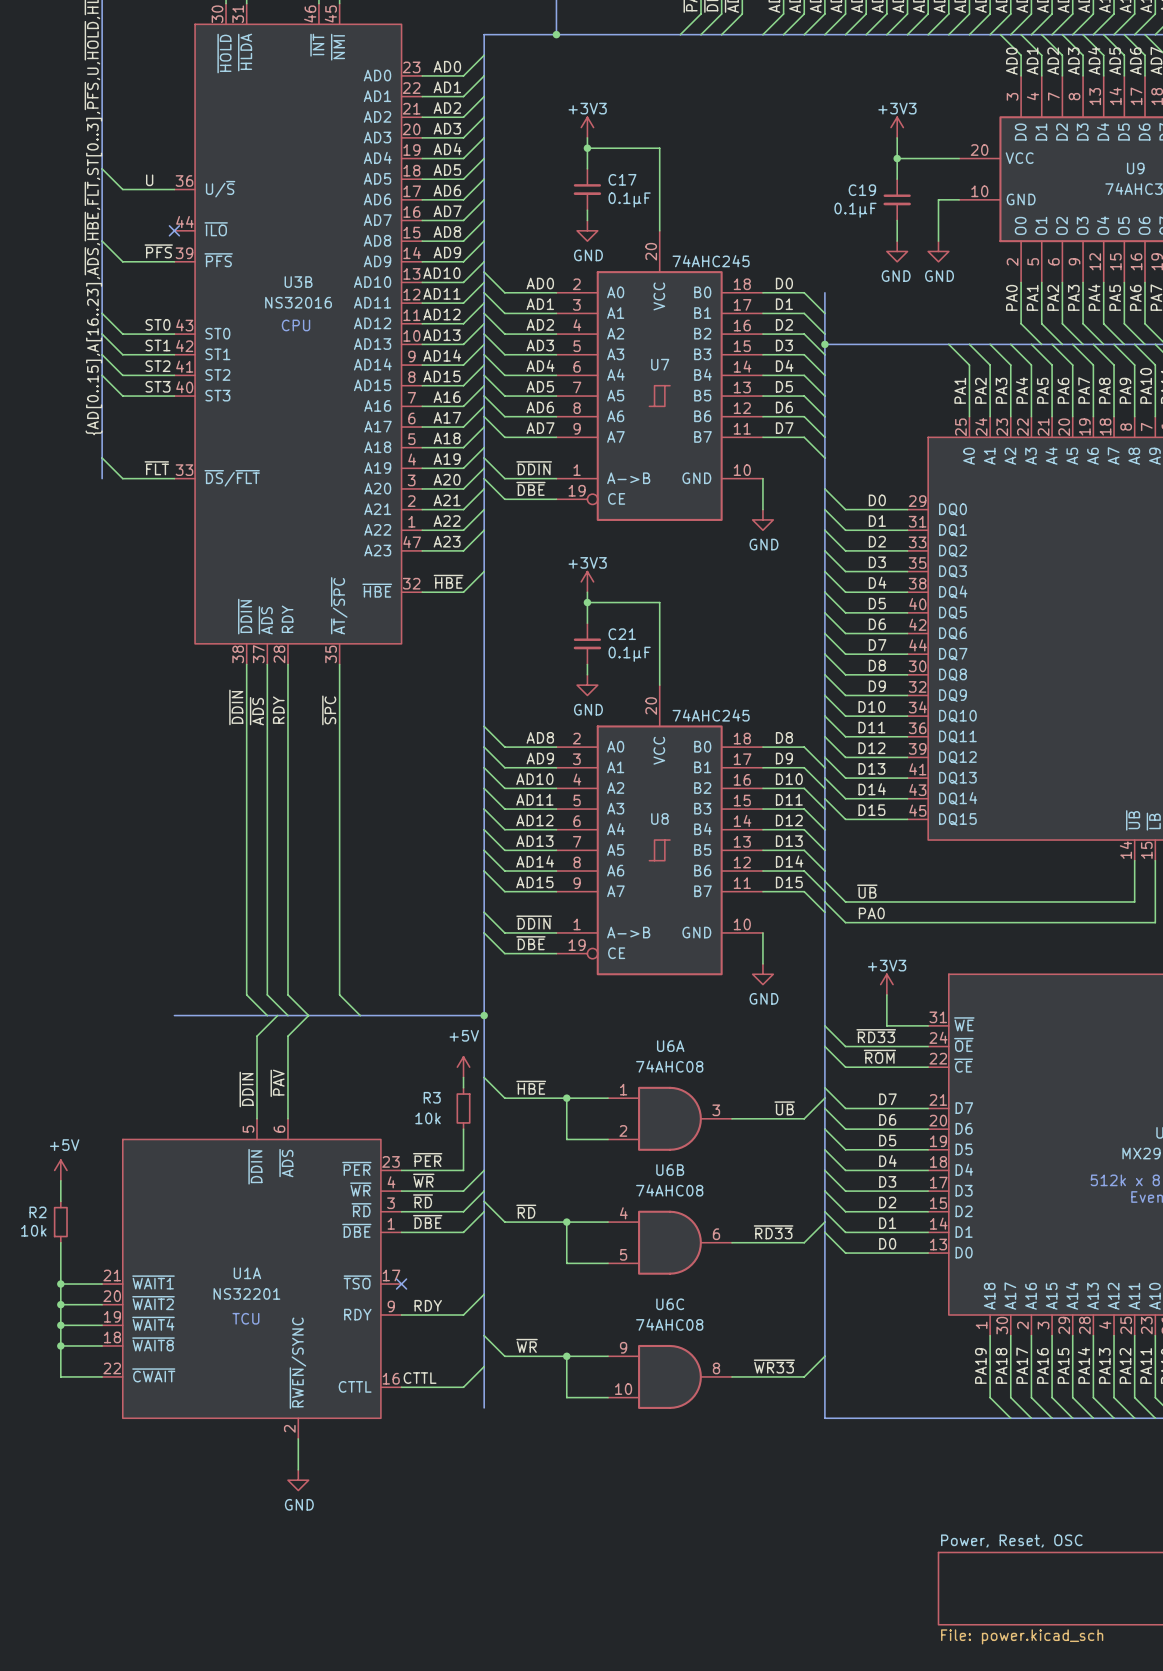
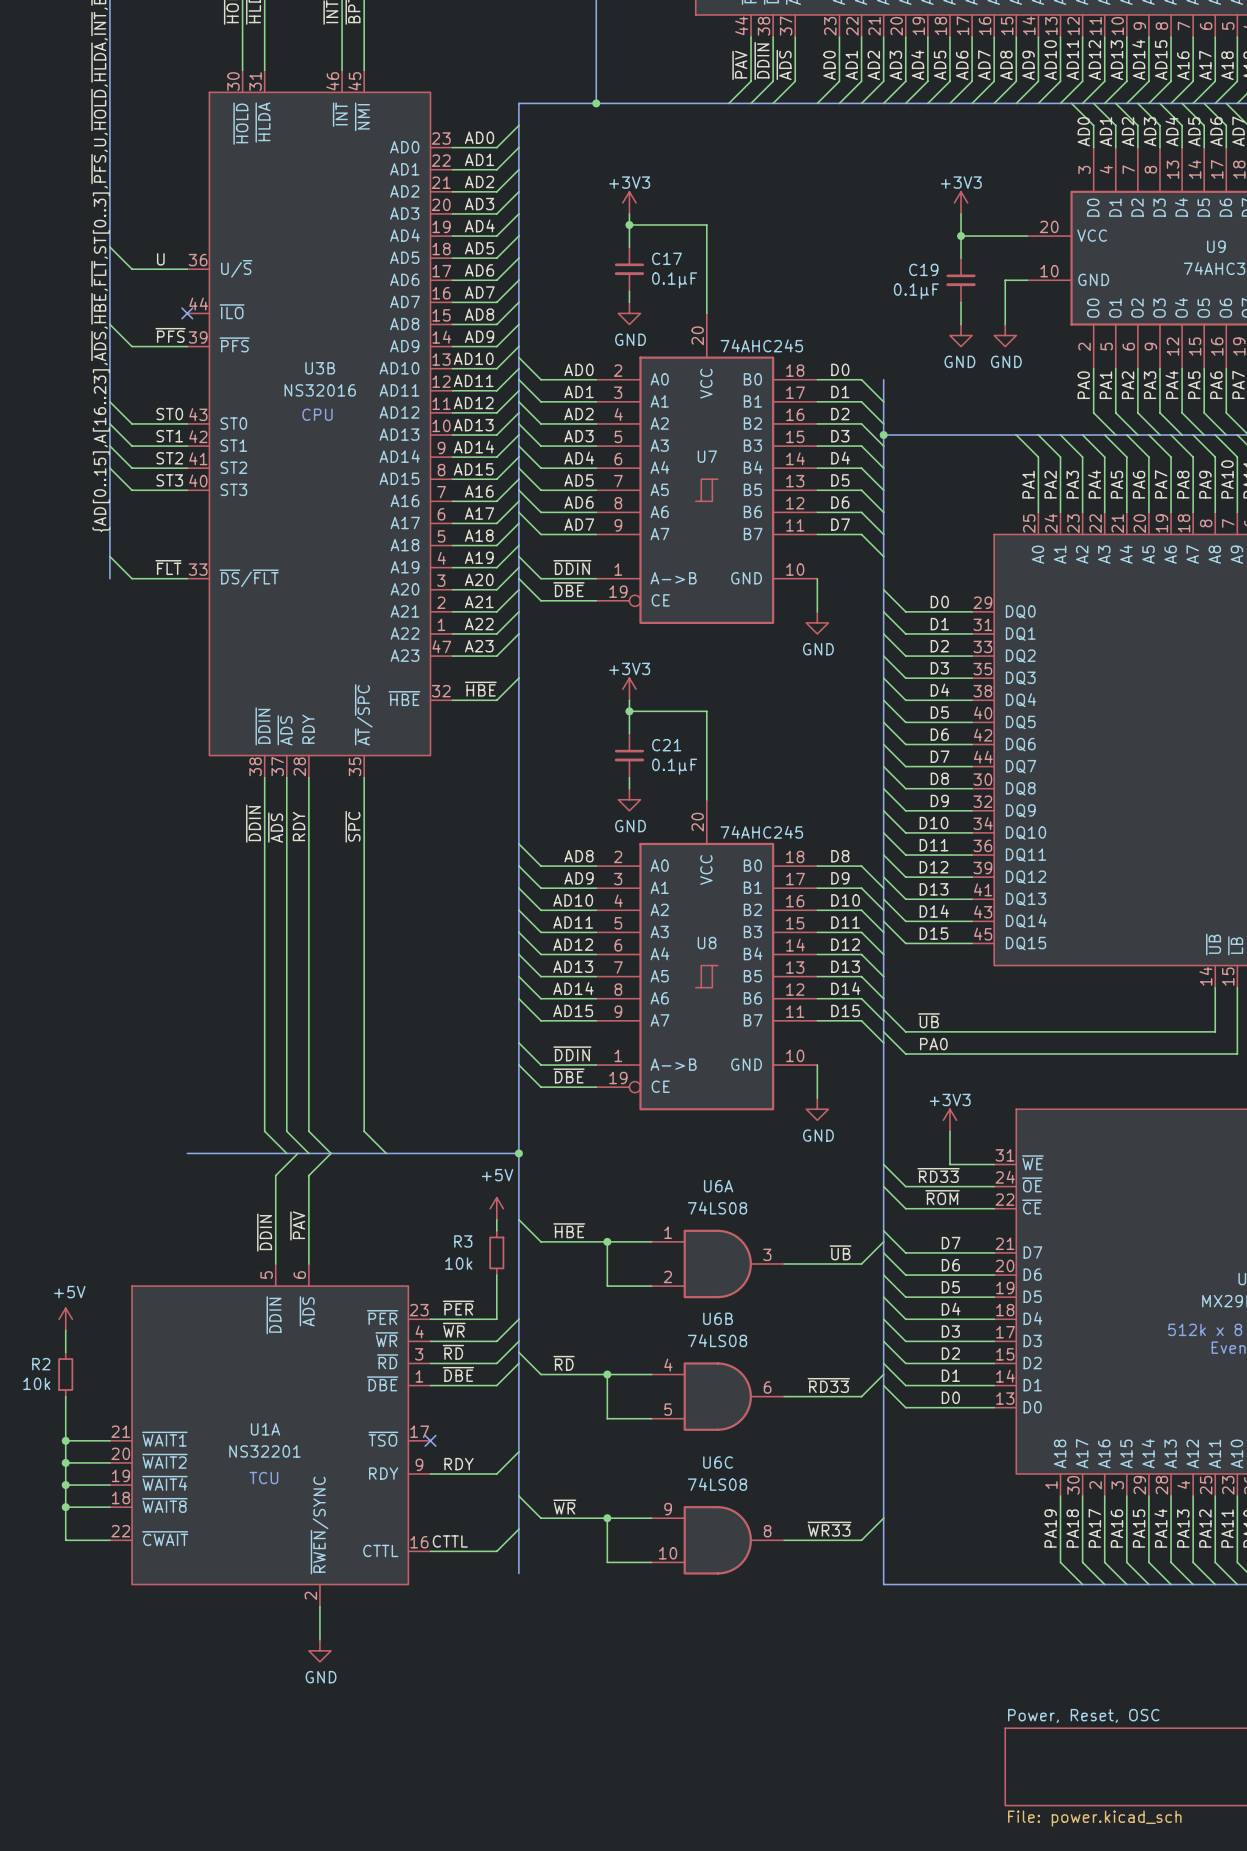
U6A value: 74AHC08 (669, 1066) -> 74LS08 (717, 1208)
U6B value: 74AHC08 (669, 1190) -> 74LS08 (717, 1340)
U6C value: 74AHC08 (669, 1324) -> 74LS08 (717, 1484)

